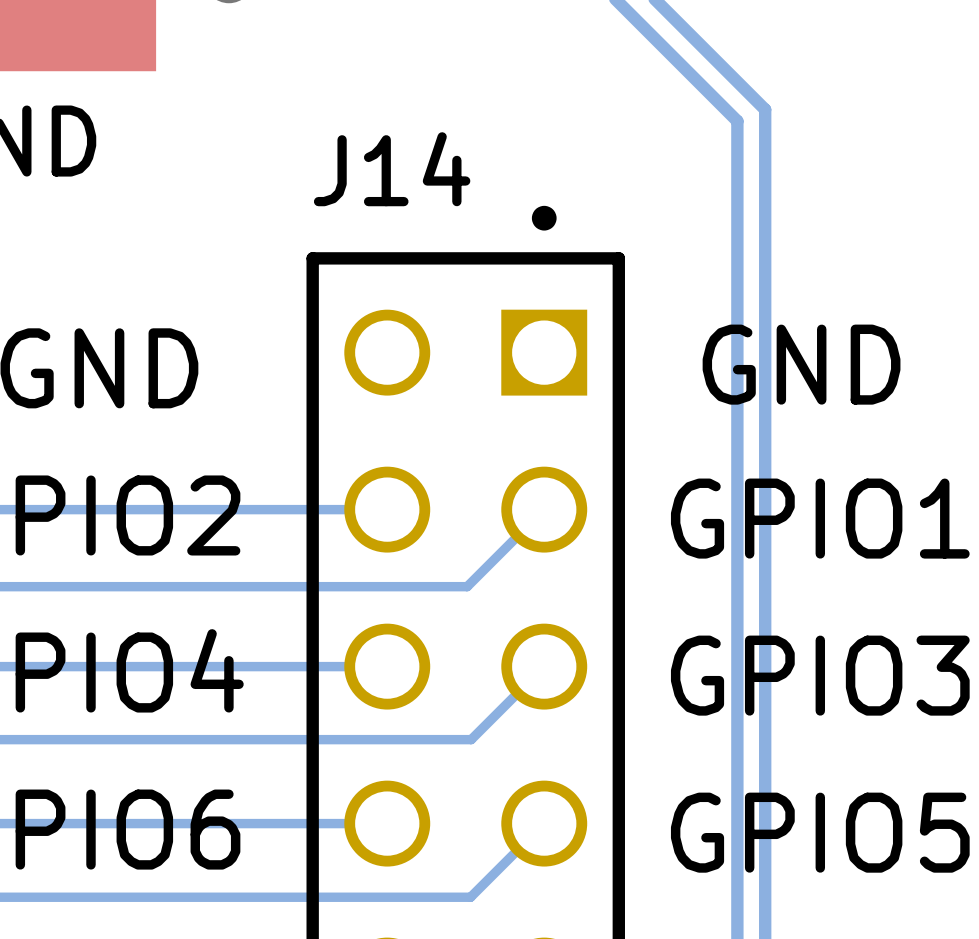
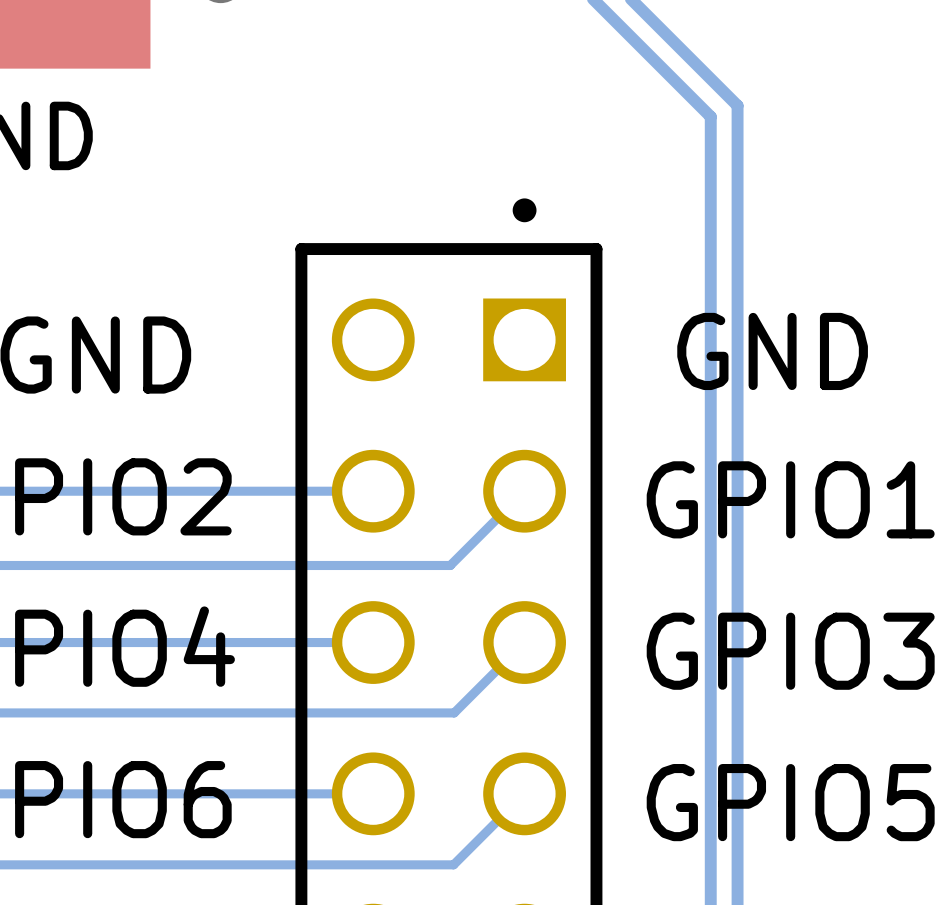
J14 name: J14 (392, 169) -> none

